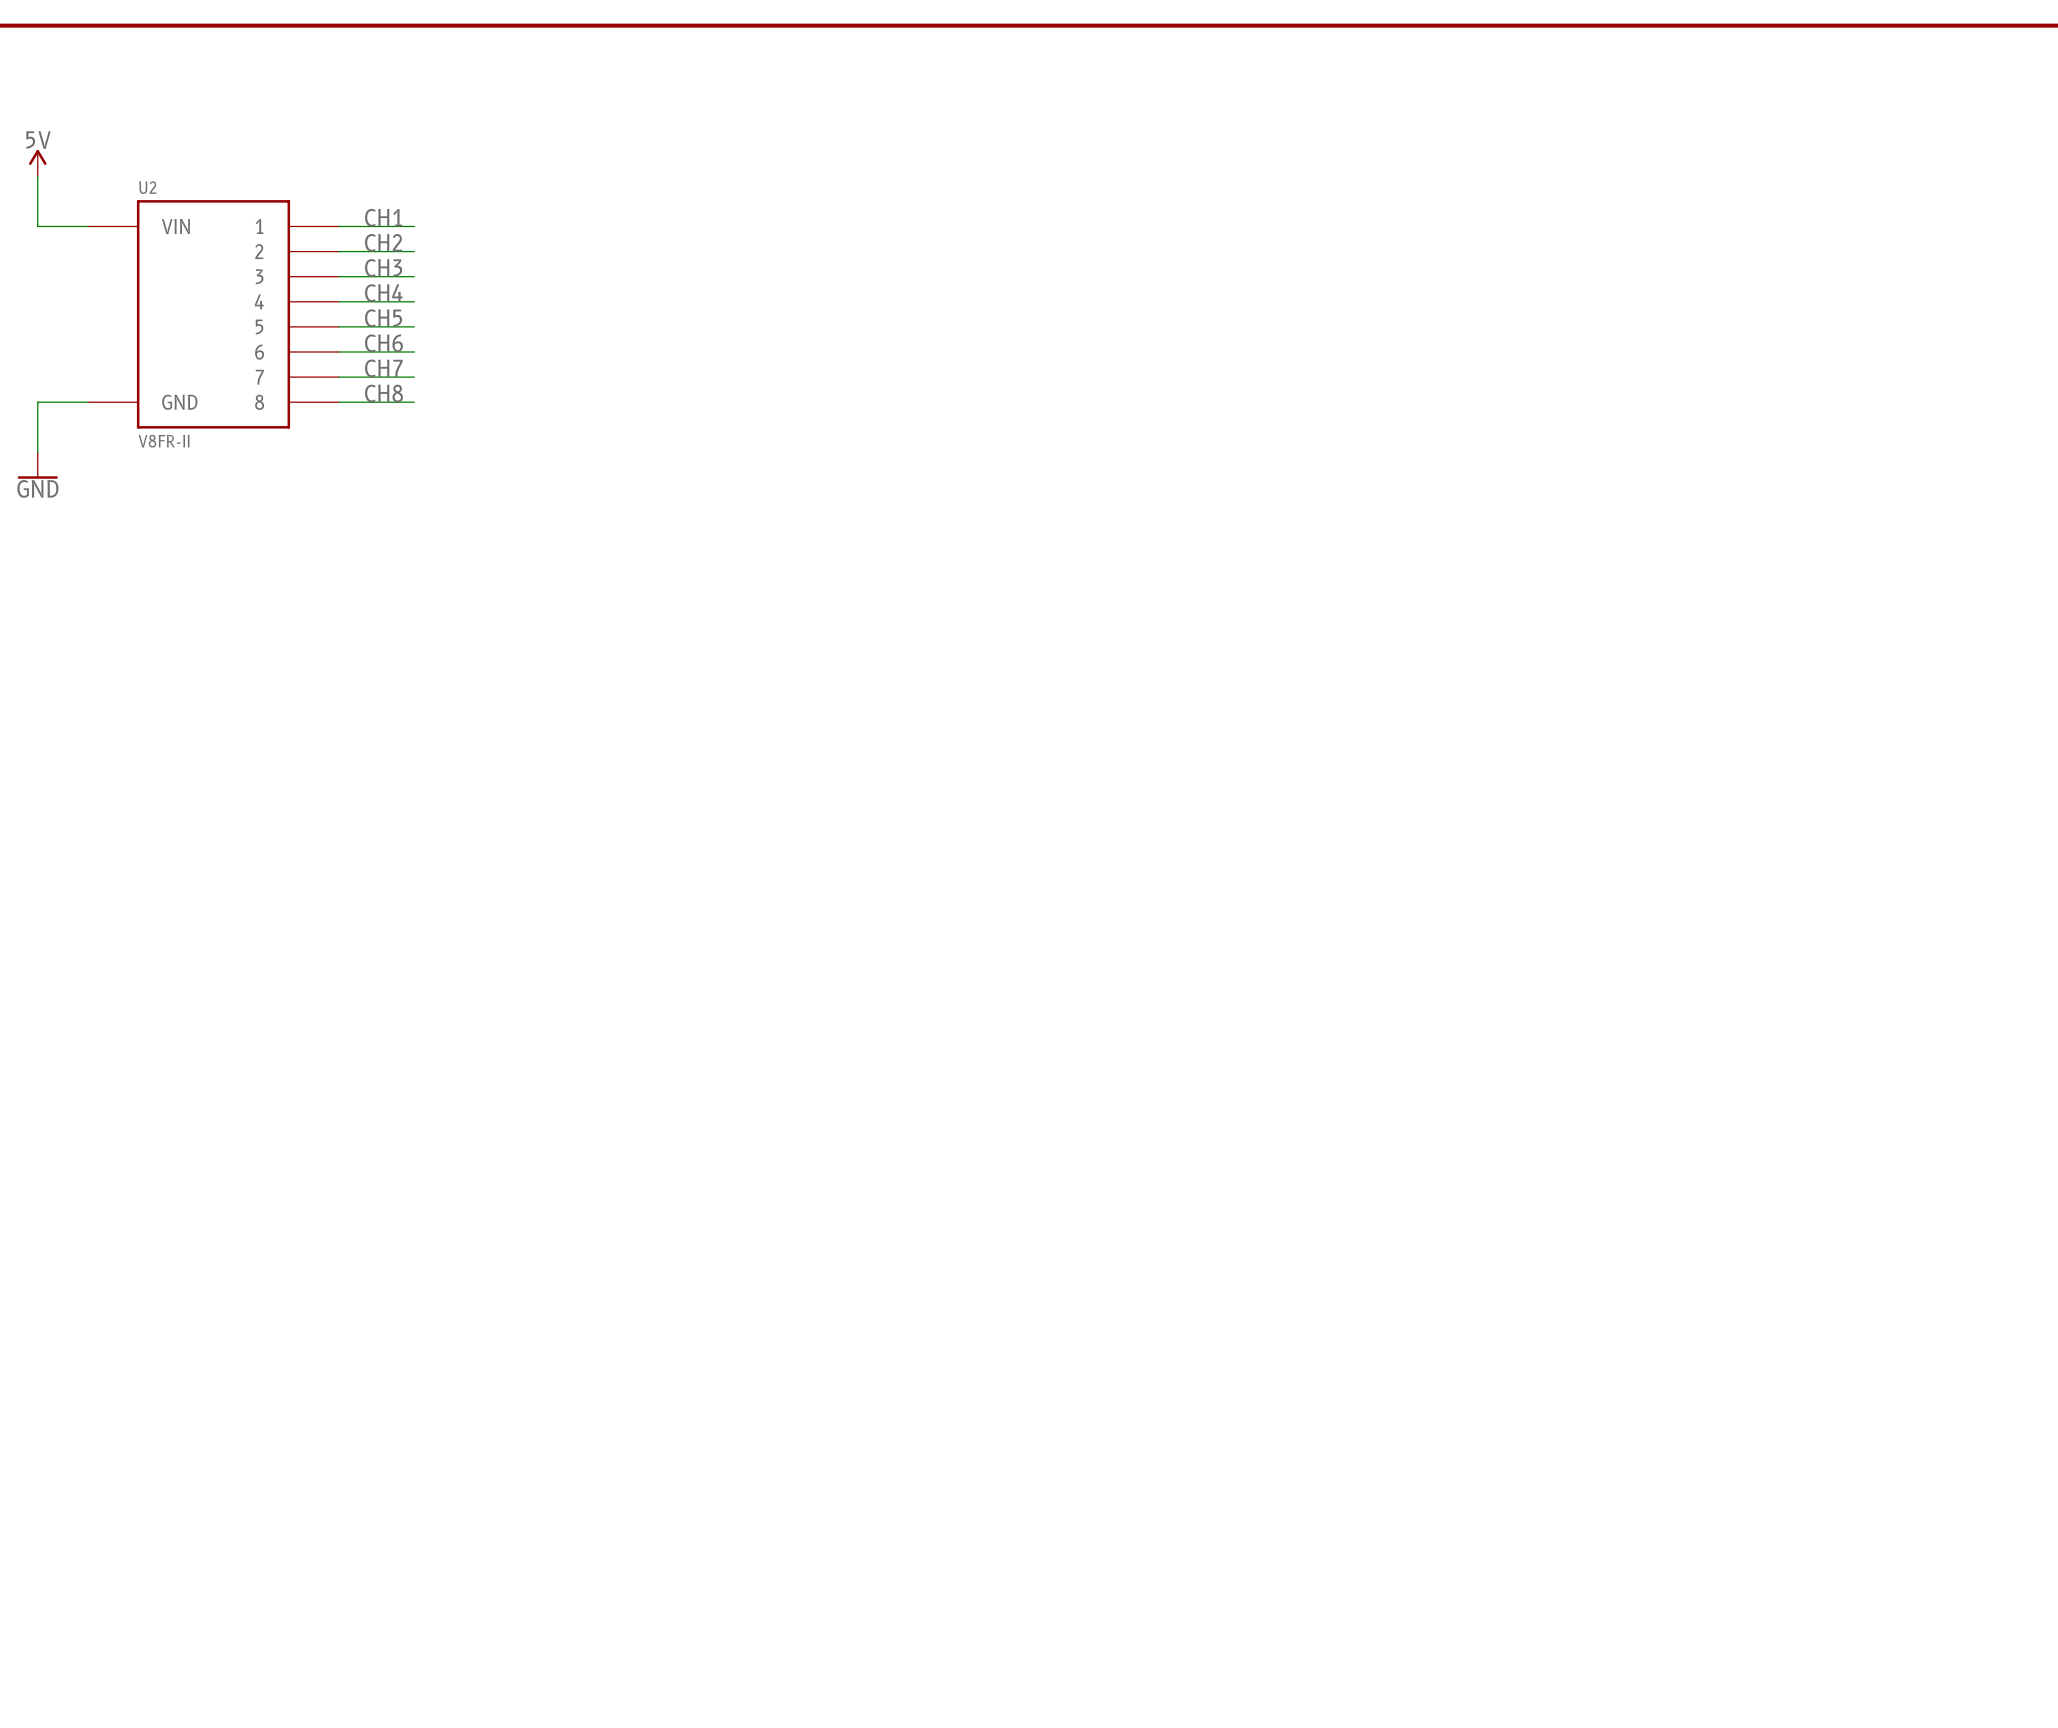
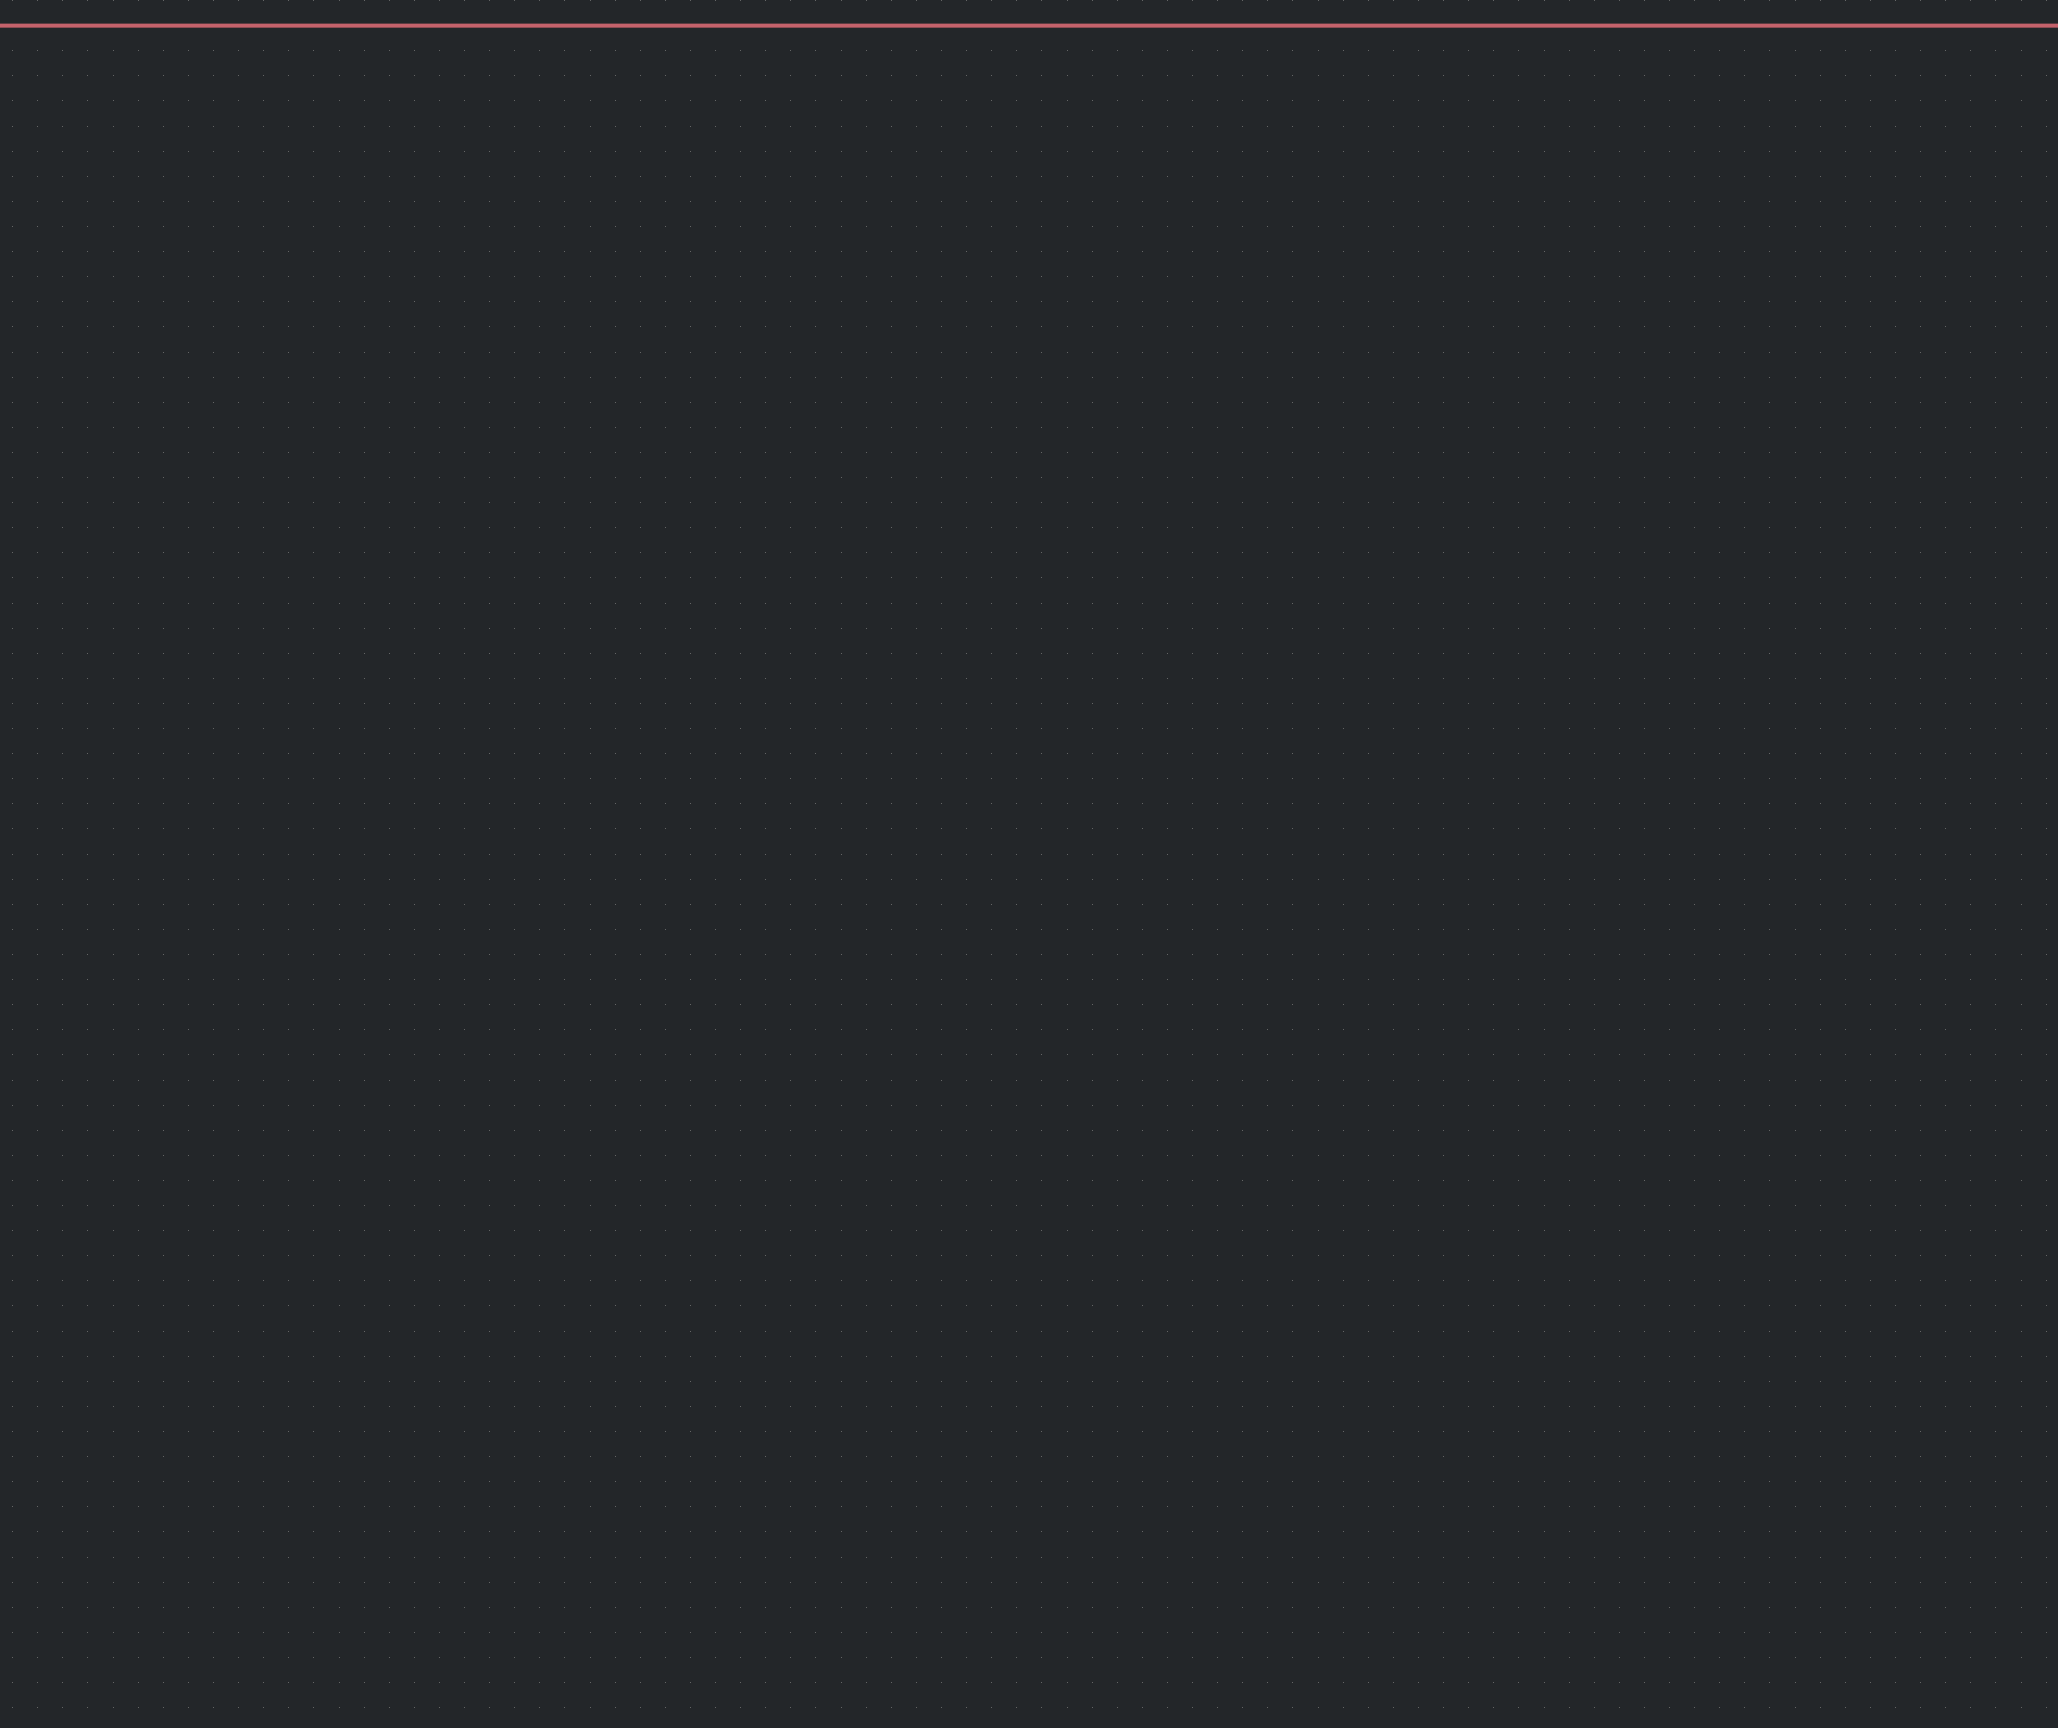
power symbol: 5V (37, 163) -> none
wire: (37, 176) (37, 226) (87, 226) -> none
label: CH1 (383, 217) -> none
wire: (339, 226) (414, 226) -> none
label: CH2 (383, 242) -> none
wire: (339, 251) (414, 251) -> none
label: CH3 (383, 267) -> none
wire: (339, 276) (414, 276) -> none
label: CH4 (383, 293) -> none
wire: (339, 301) (414, 301) -> none
U2: V8FR-II (213, 314) -> none
label: CH5 (383, 318) -> none
wire: (339, 326) (414, 326) -> none
label: CH6 (383, 343) -> none
wire: (339, 352) (414, 352) -> none
label: CH7 (383, 368) -> none
wire: (339, 377) (414, 377) -> none
label: CH8 (383, 393) -> none
wire: (87, 402) (37, 402) (37, 452) -> none
wire: (339, 402) (414, 402) -> none
power symbol: GND (37, 465) -> none

